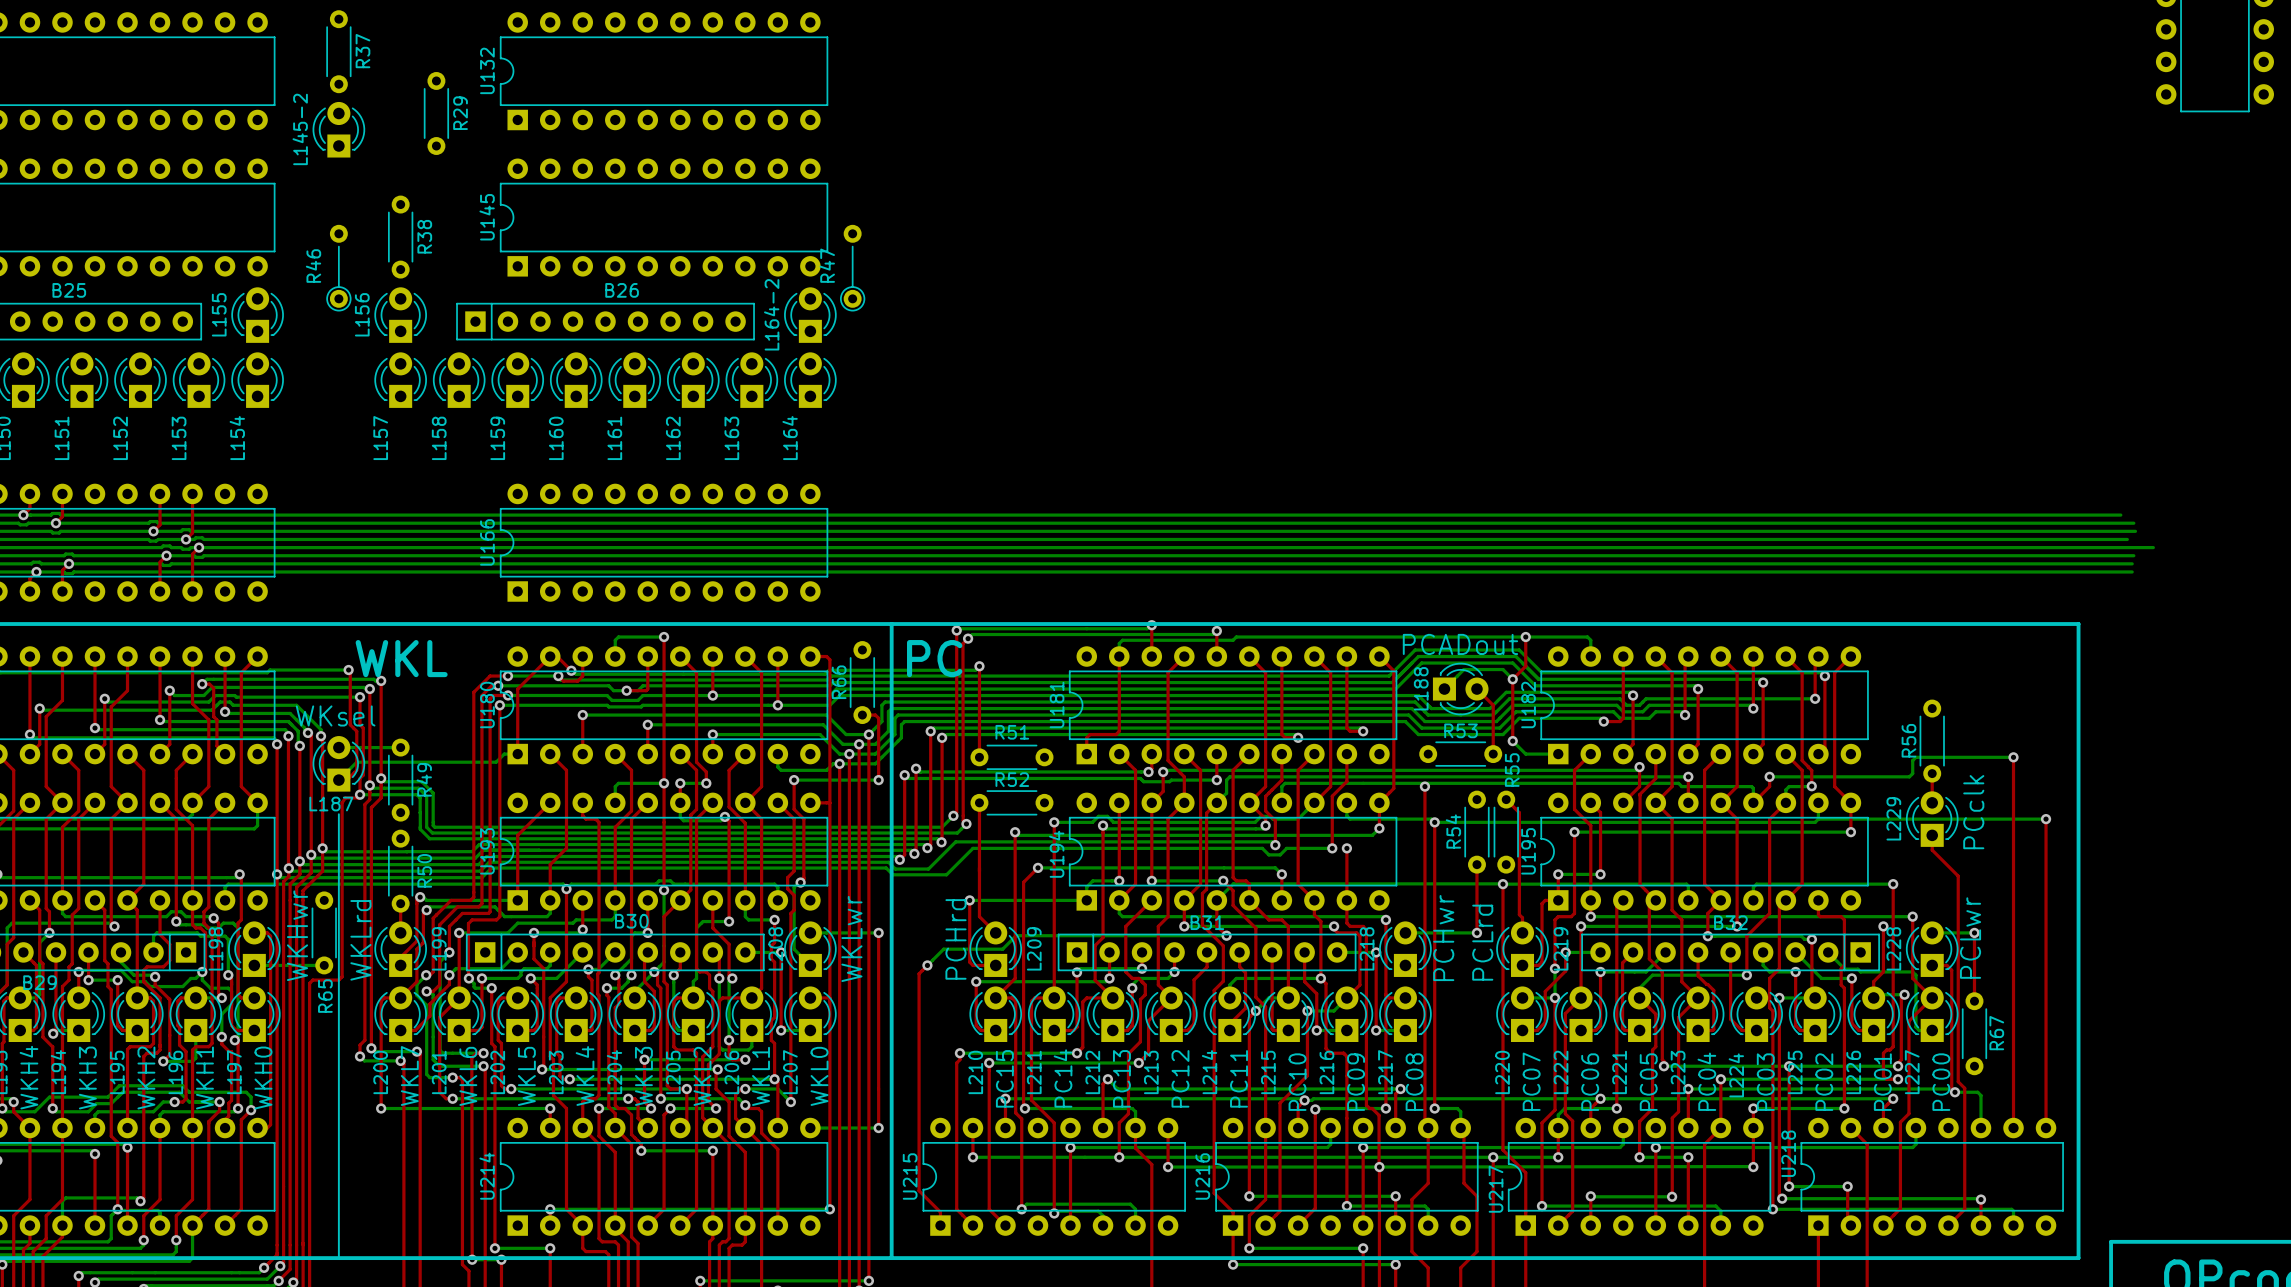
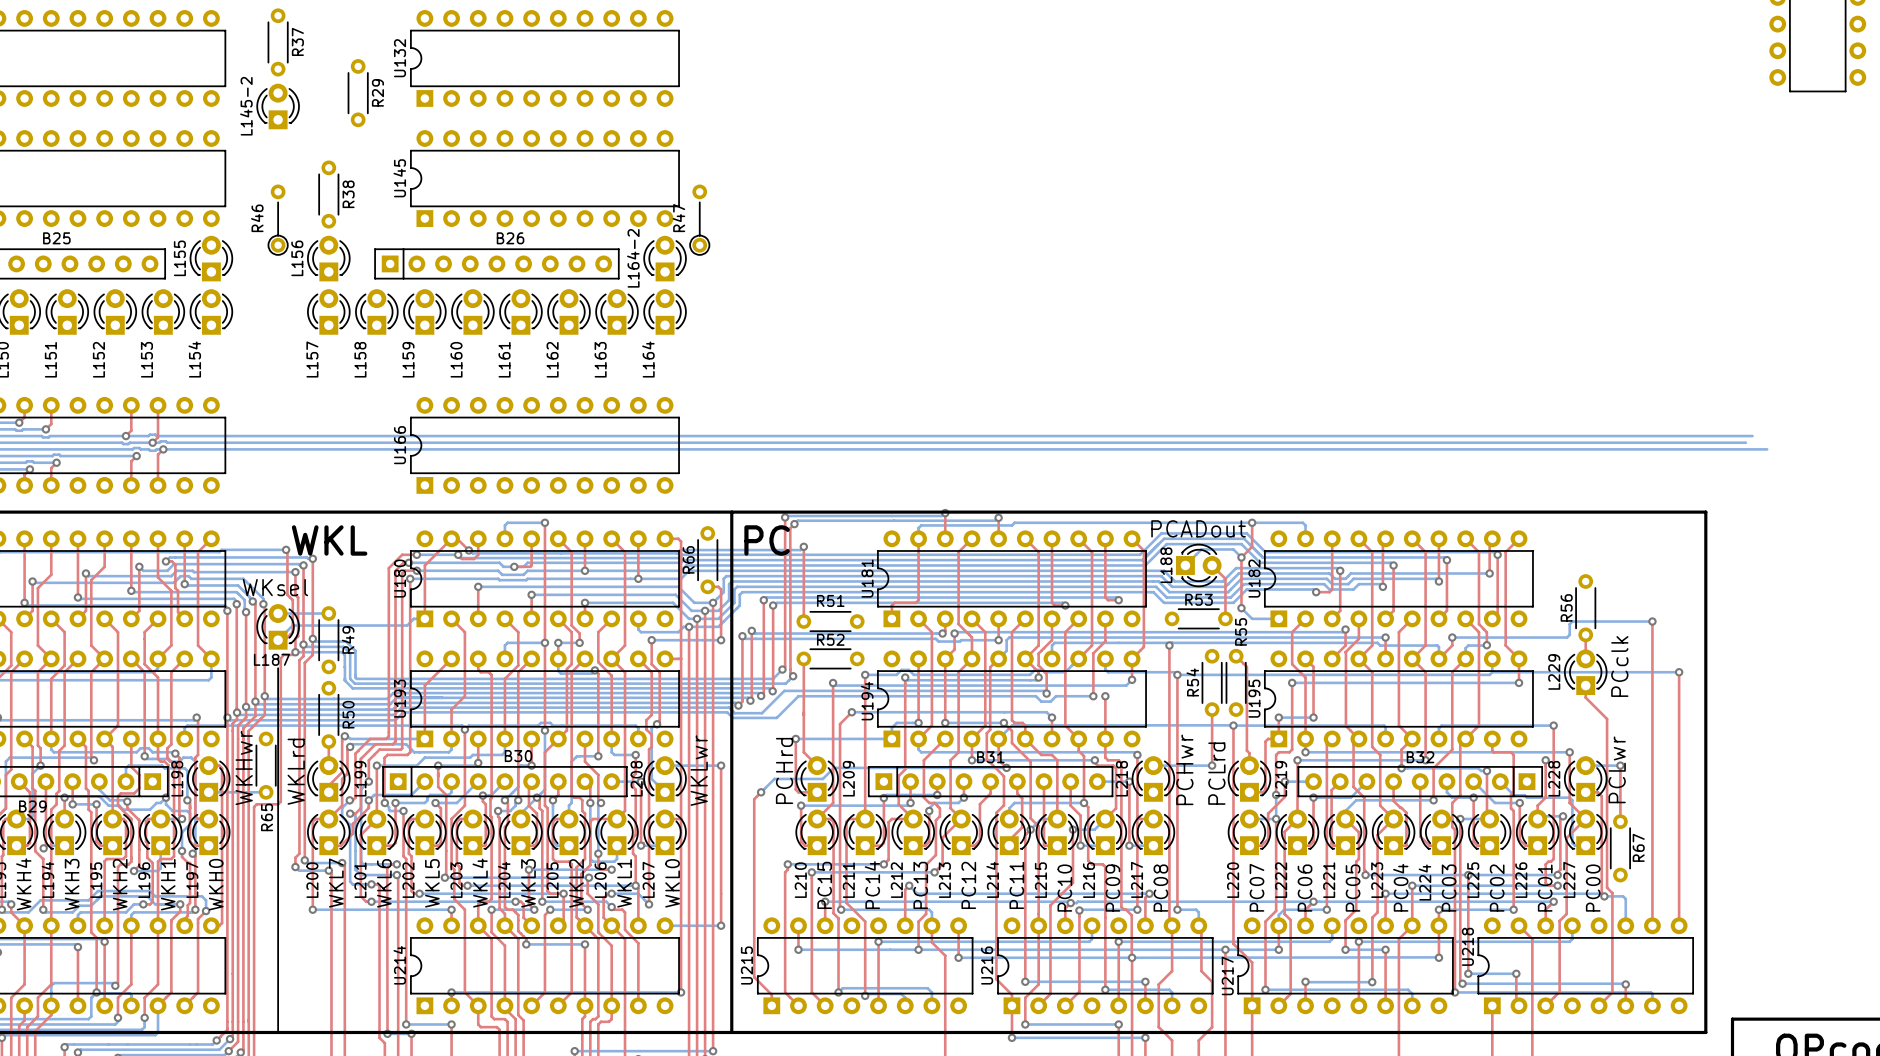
bottom track: (23, 515) (51, 515) (52, 513) (60, 515) (2120, 515) -> none
bottom track: (55, 523) (148, 523) (150, 521) (158, 523) (2133, 523) -> none
bottom track: (166, 555) (194, 555) (195, 557) (203, 555) (2133, 555) -> none
bottom track: (68, 563) (161, 563) (163, 565) (171, 563) (2132, 563) -> none
bottom track: (36, 571) (64, 571) (65, 573) (73, 571) (2132, 571) -> none

